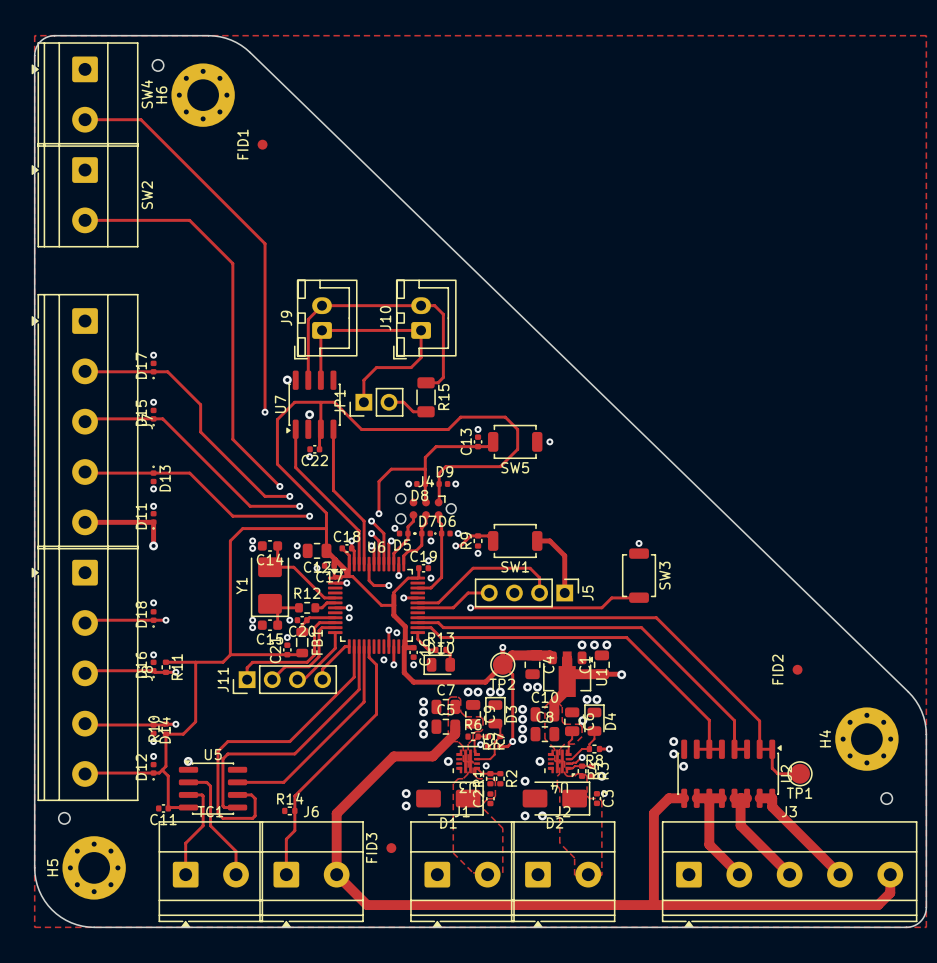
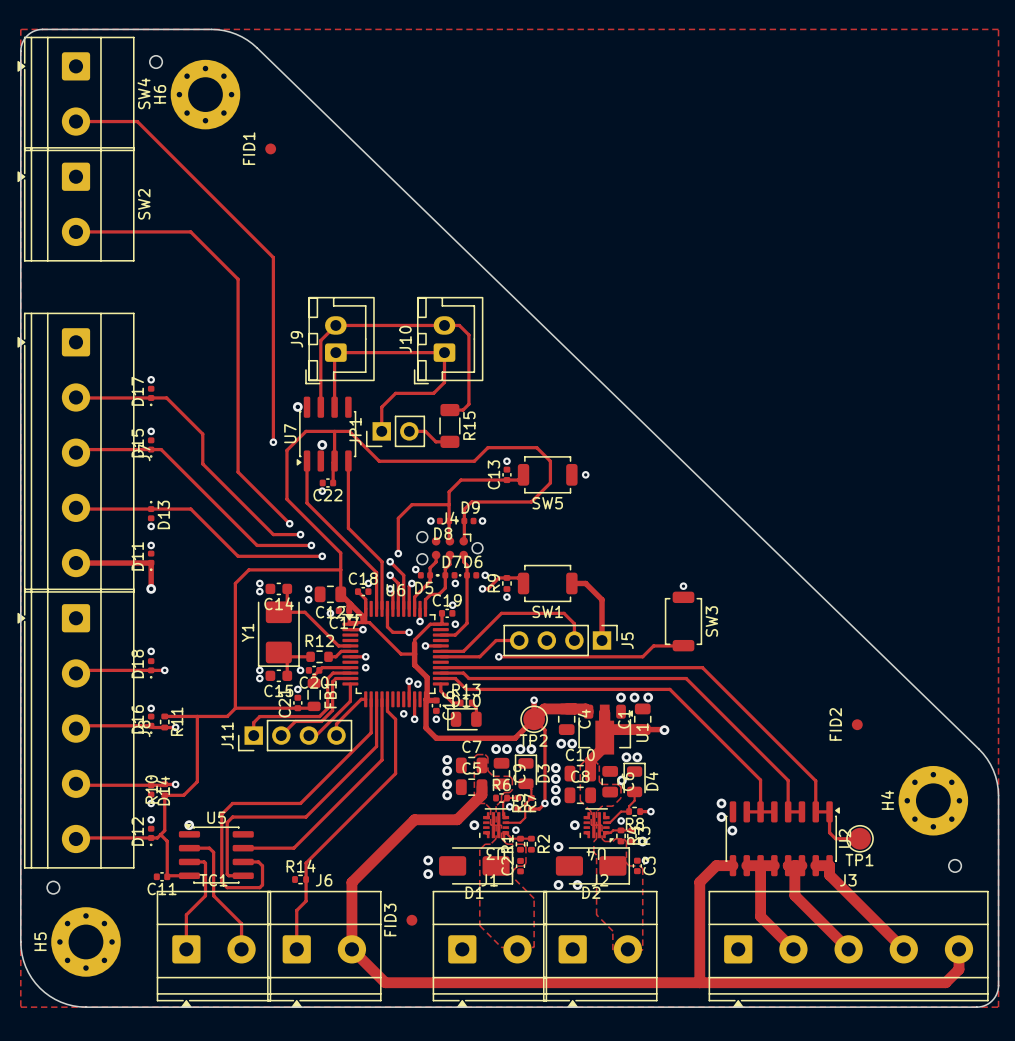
track: (351, 540) (354, 564) -> none
track: (572, 731) (572, 739) (568, 742) (568, 754) -> none
track: (582, 757) (576, 762) (568, 763) -> none

